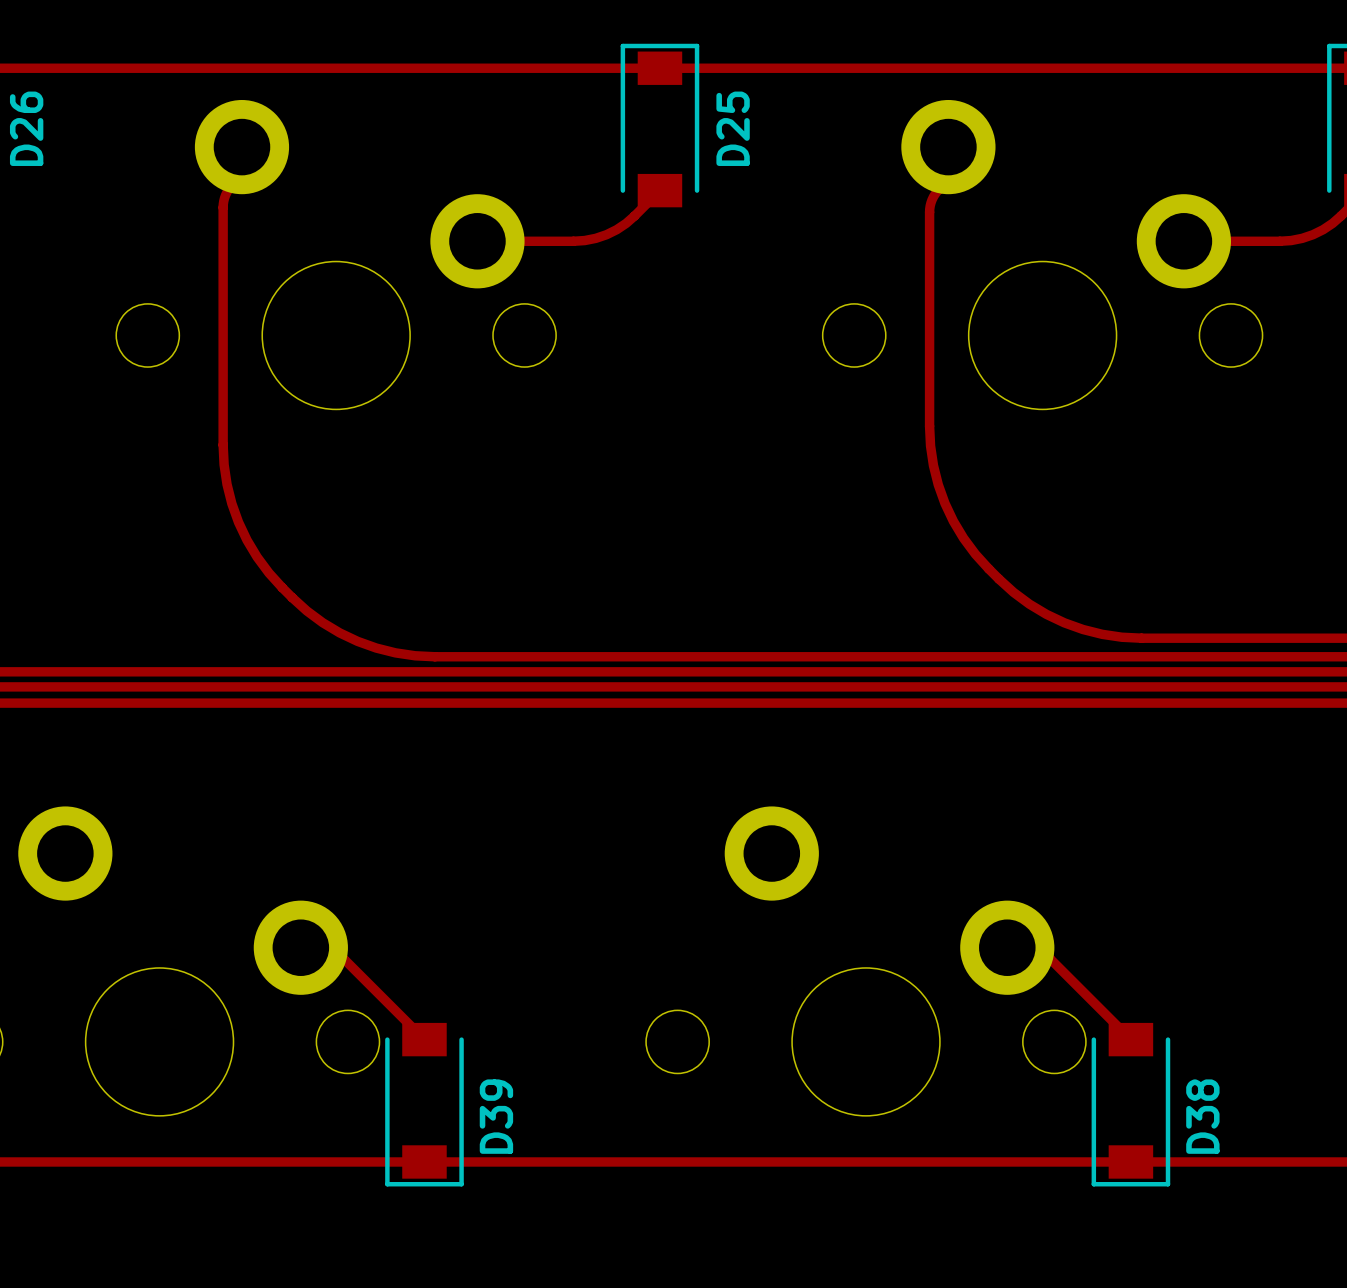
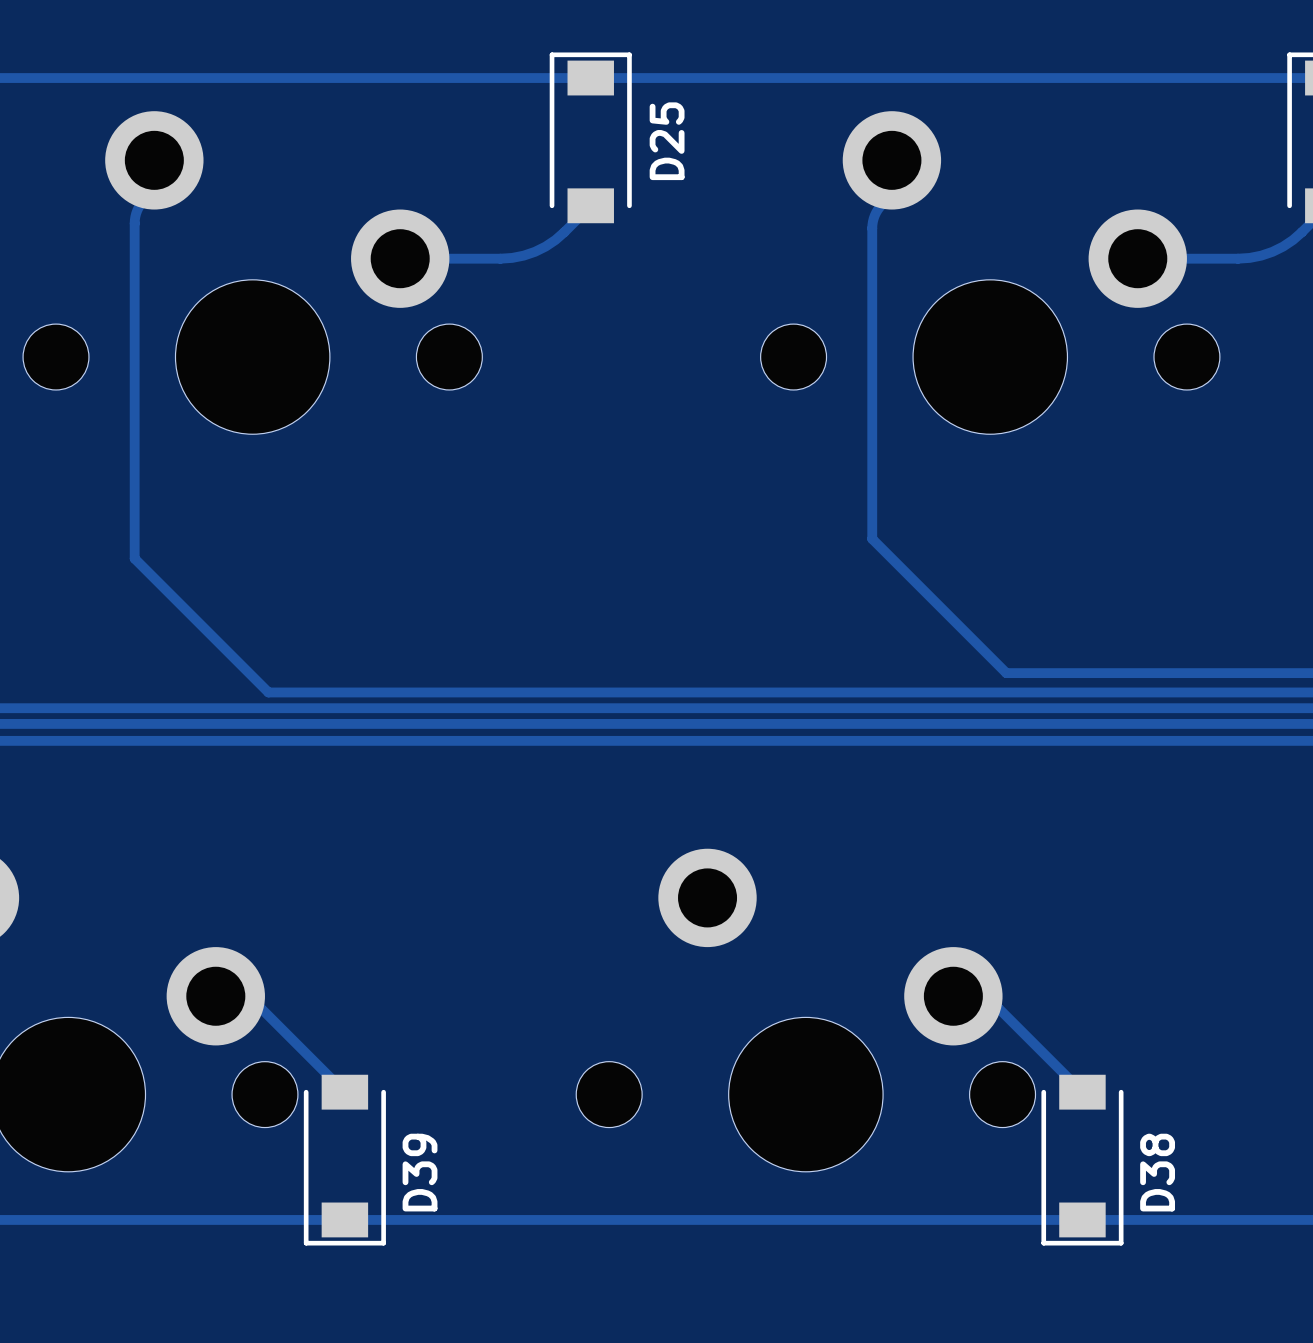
track: (929, 426) (933, 465) (944, 503) (963, 538) (988, 568) -> (872, 451) (872, 538) (933, 600)
track: (223, 444) (227, 484) (238, 522) (257, 557) (282, 587) -> (134, 471) (134, 558) (196, 620)
track: (998, 579) (1029, 604) (1064, 622) (1102, 634) (1141, 638) -> (944, 611) (1006, 673) (1093, 673)
track: (292, 597) (322, 622) (357, 641) (395, 652) (434, 656) -> (206, 630) (268, 692) (355, 692)

